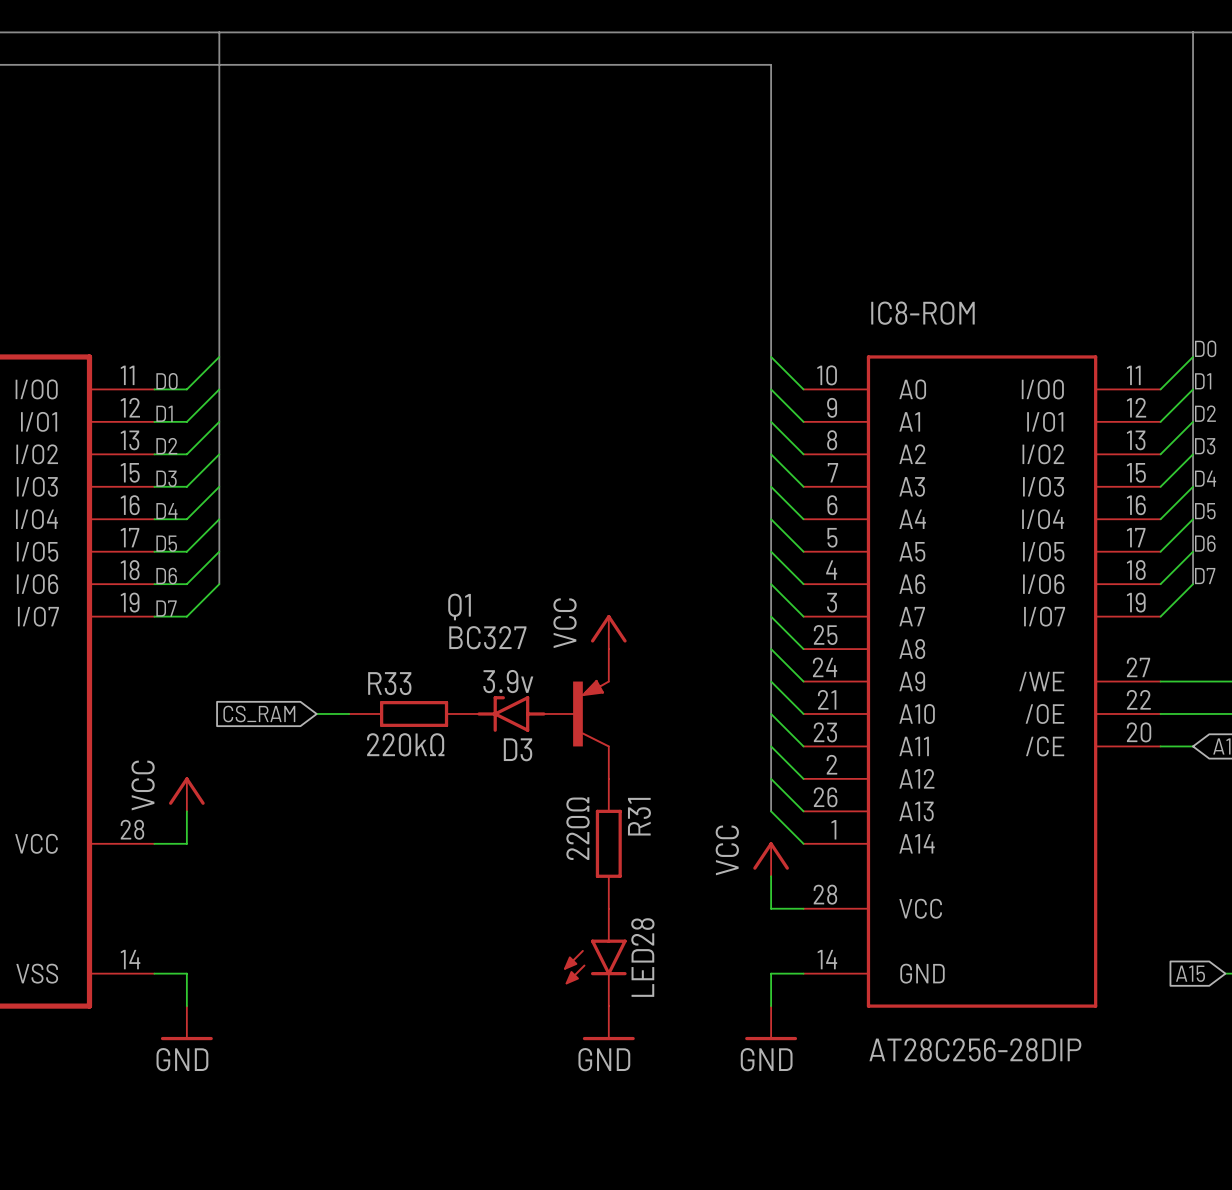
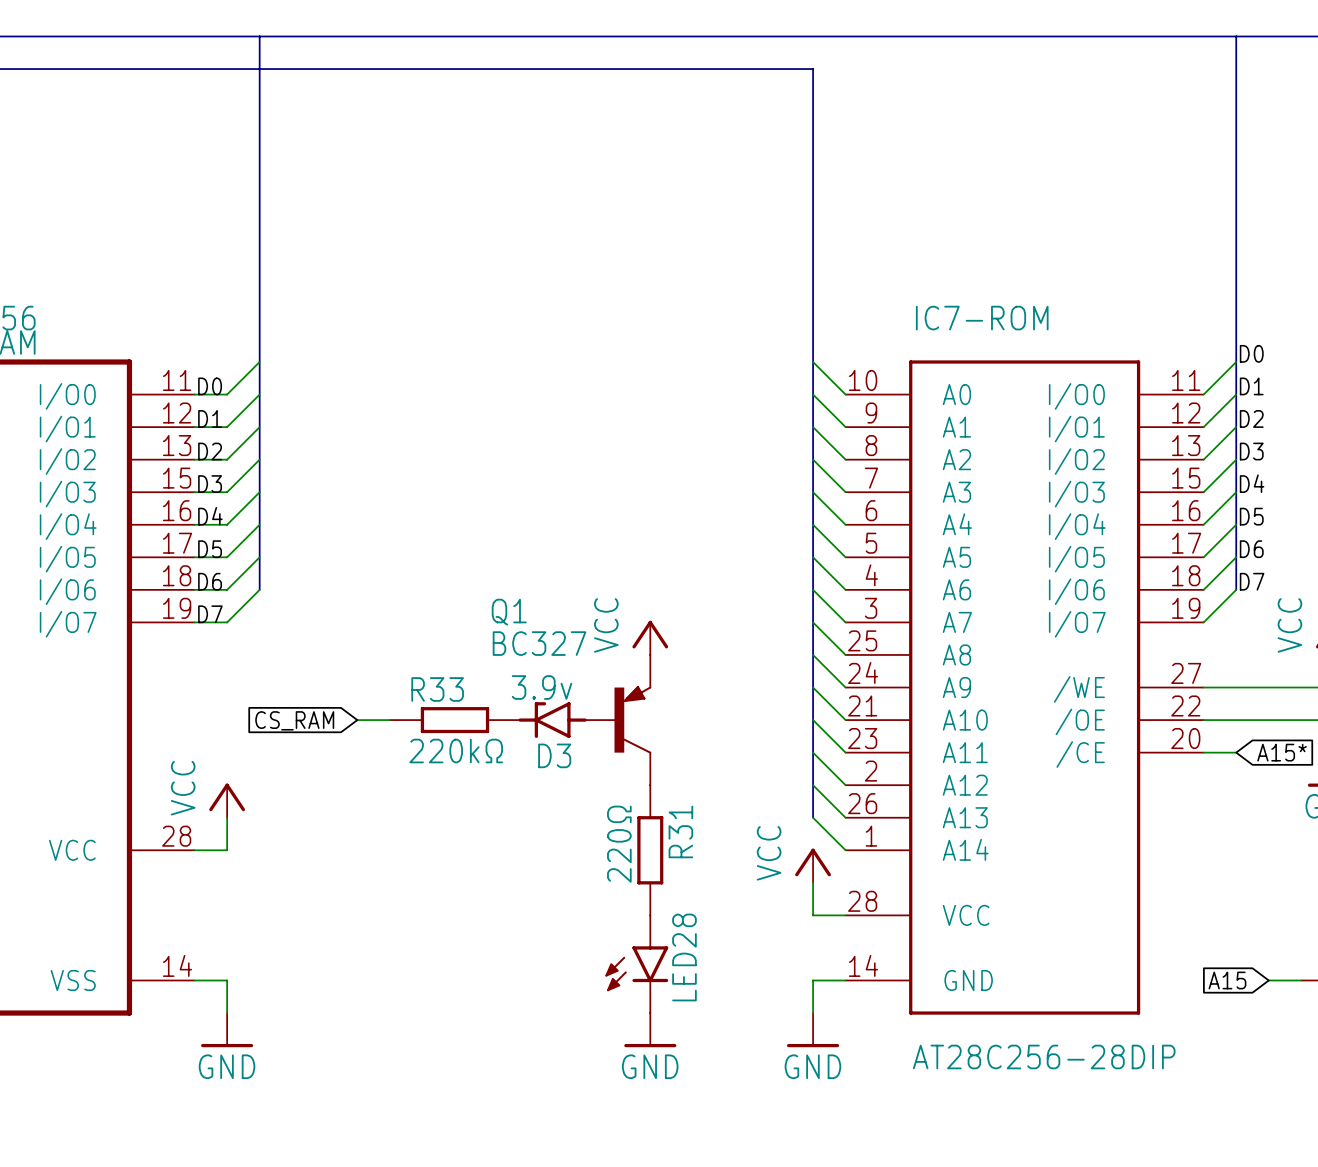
IC8-ROM name: IC8-ROM (922, 313) -> IC7-ROM (982, 318)

